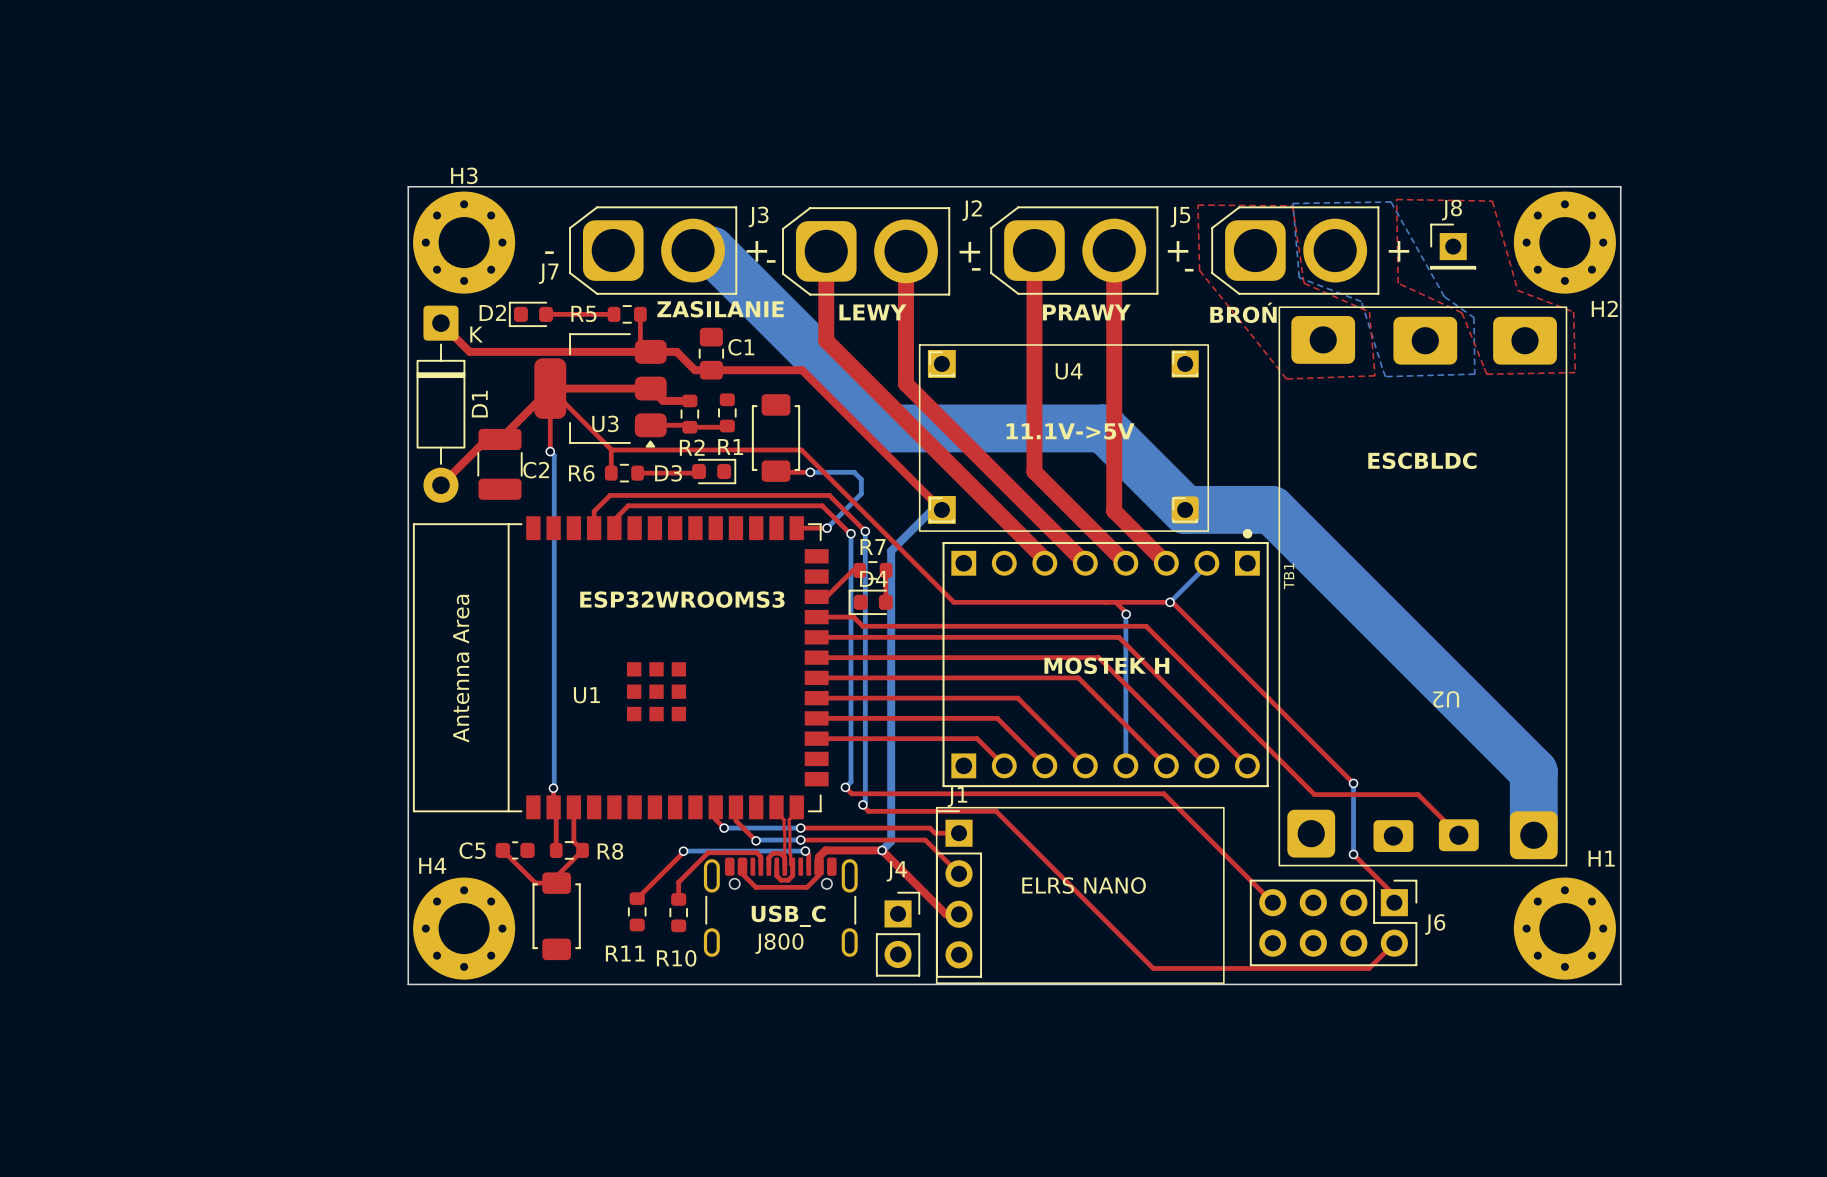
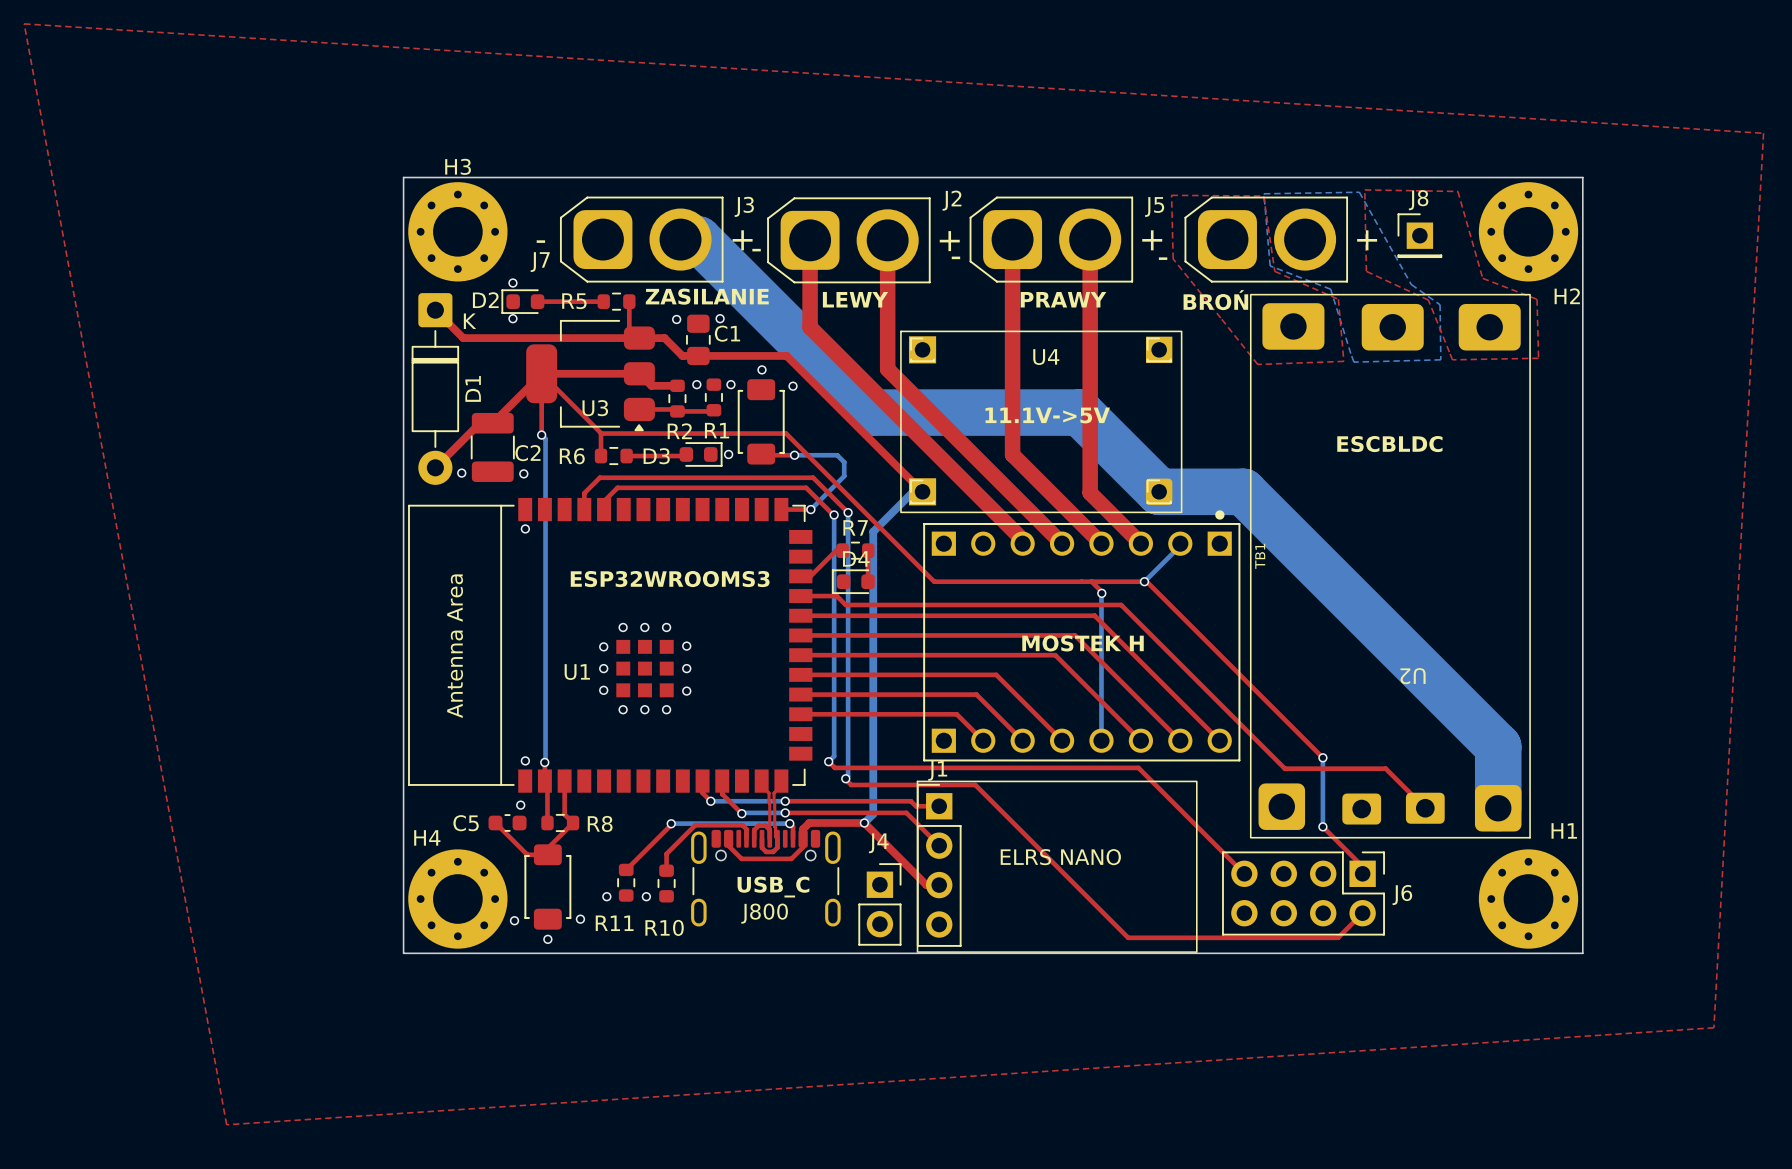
top zone outline: none -> (24, 23) (226, 1124) (1713, 1027) (1763, 133) (24, 23)
via: none -> (512, 283)
via: none -> (512, 318)
via: none -> (720, 318)
via: none -> (676, 319)
via: none -> (761, 369)
via: none -> (696, 384)
via: none -> (730, 384)
via: none -> (793, 386)
via: none -> (728, 454)
via: none -> (461, 473)
via: none -> (523, 473)
via: none -> (525, 528)
via: none -> (623, 627)
via: none -> (644, 627)
via: none -> (666, 627)
via: none -> (686, 646)
via: none -> (603, 646)
via: none -> (603, 668)
via: none -> (686, 668)
via: none -> (603, 690)
via: none -> (686, 691)
via: none -> (623, 709)
via: none -> (644, 709)
via: none -> (666, 709)
via: none -> (525, 760)
via: none -> (520, 805)
via: none -> (606, 896)
via: none -> (646, 896)
via: none -> (580, 919)
via: none -> (514, 920)
via: none -> (547, 939)

